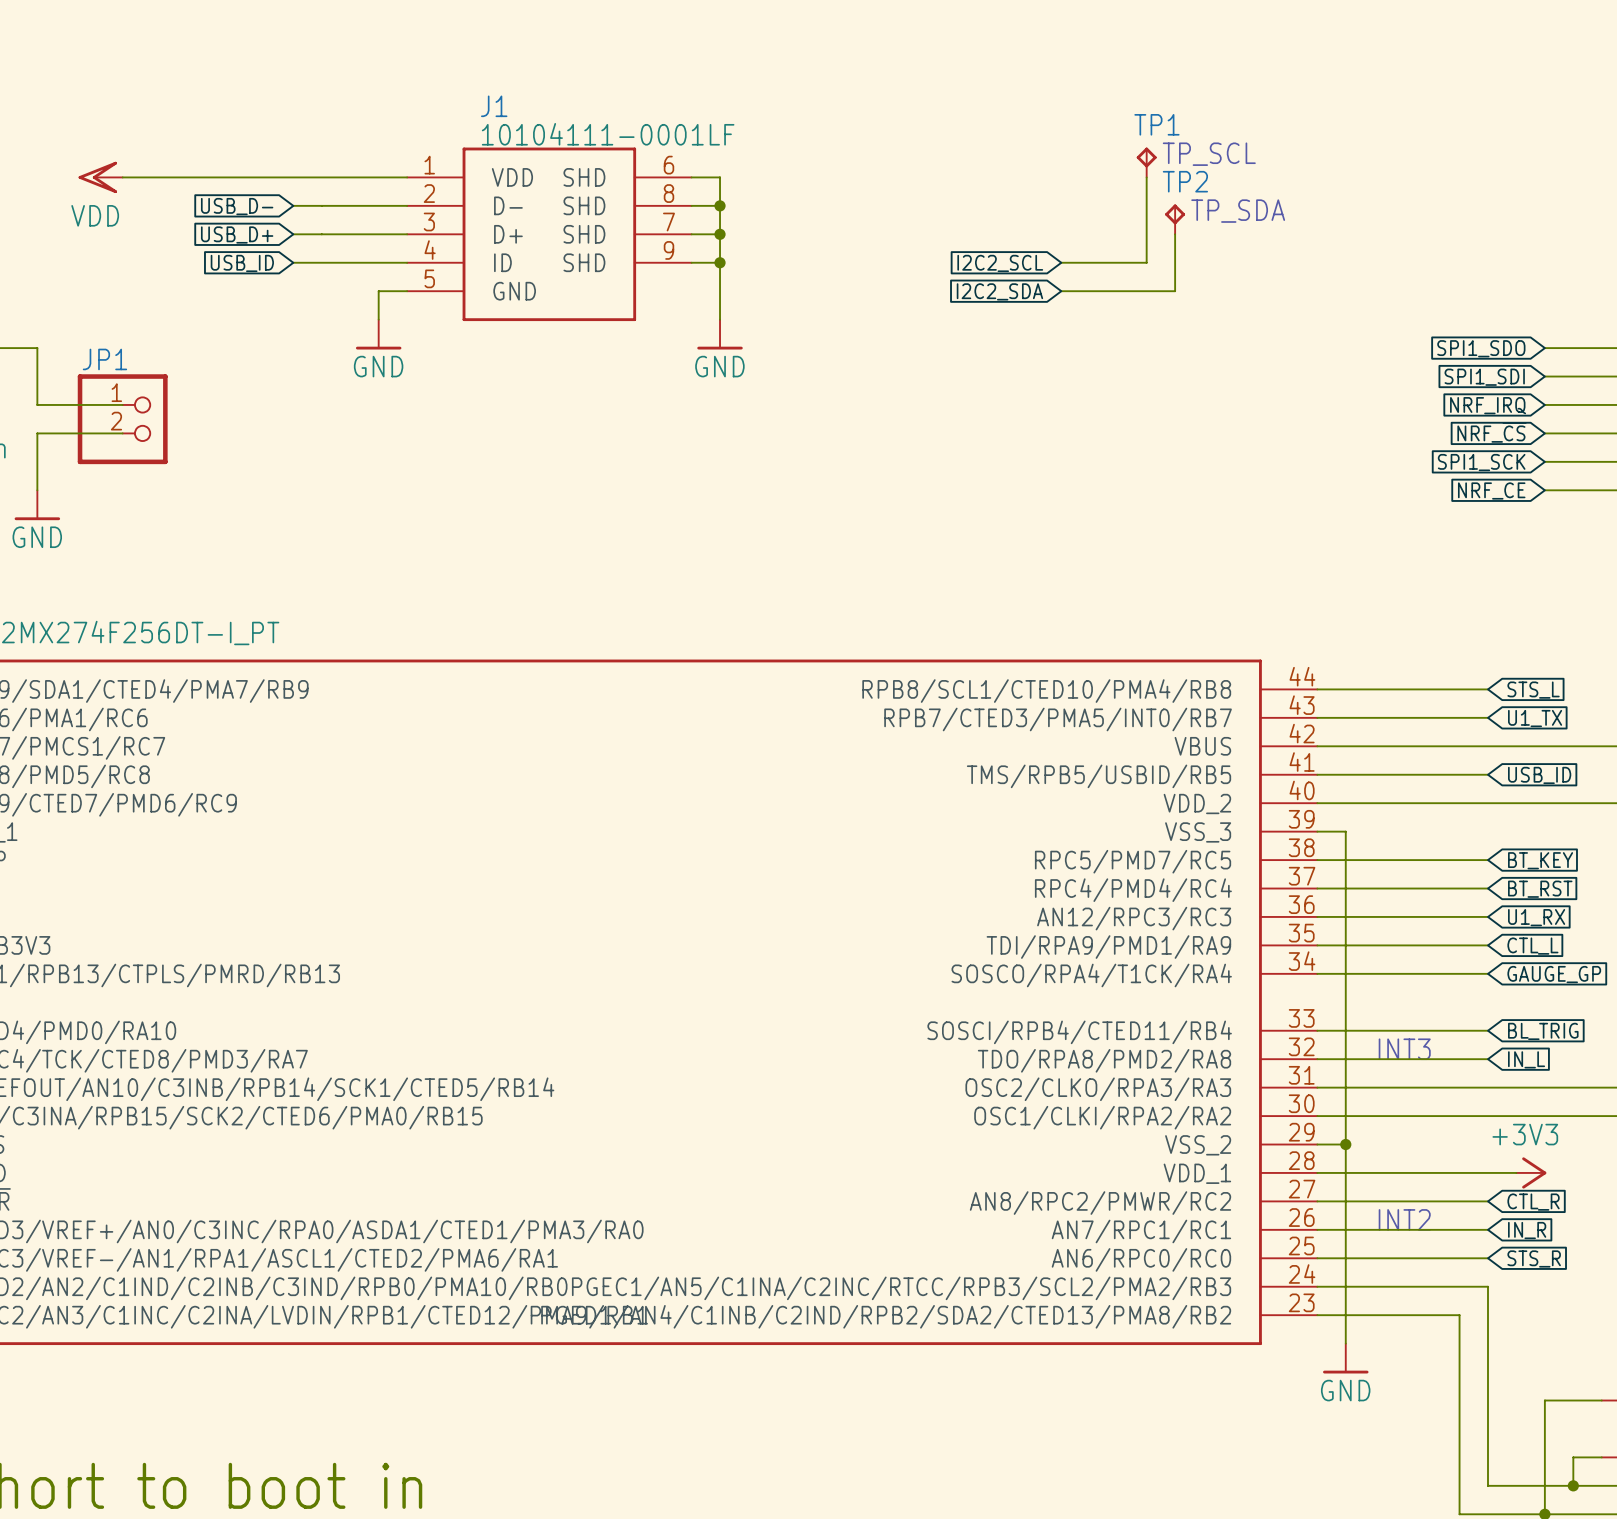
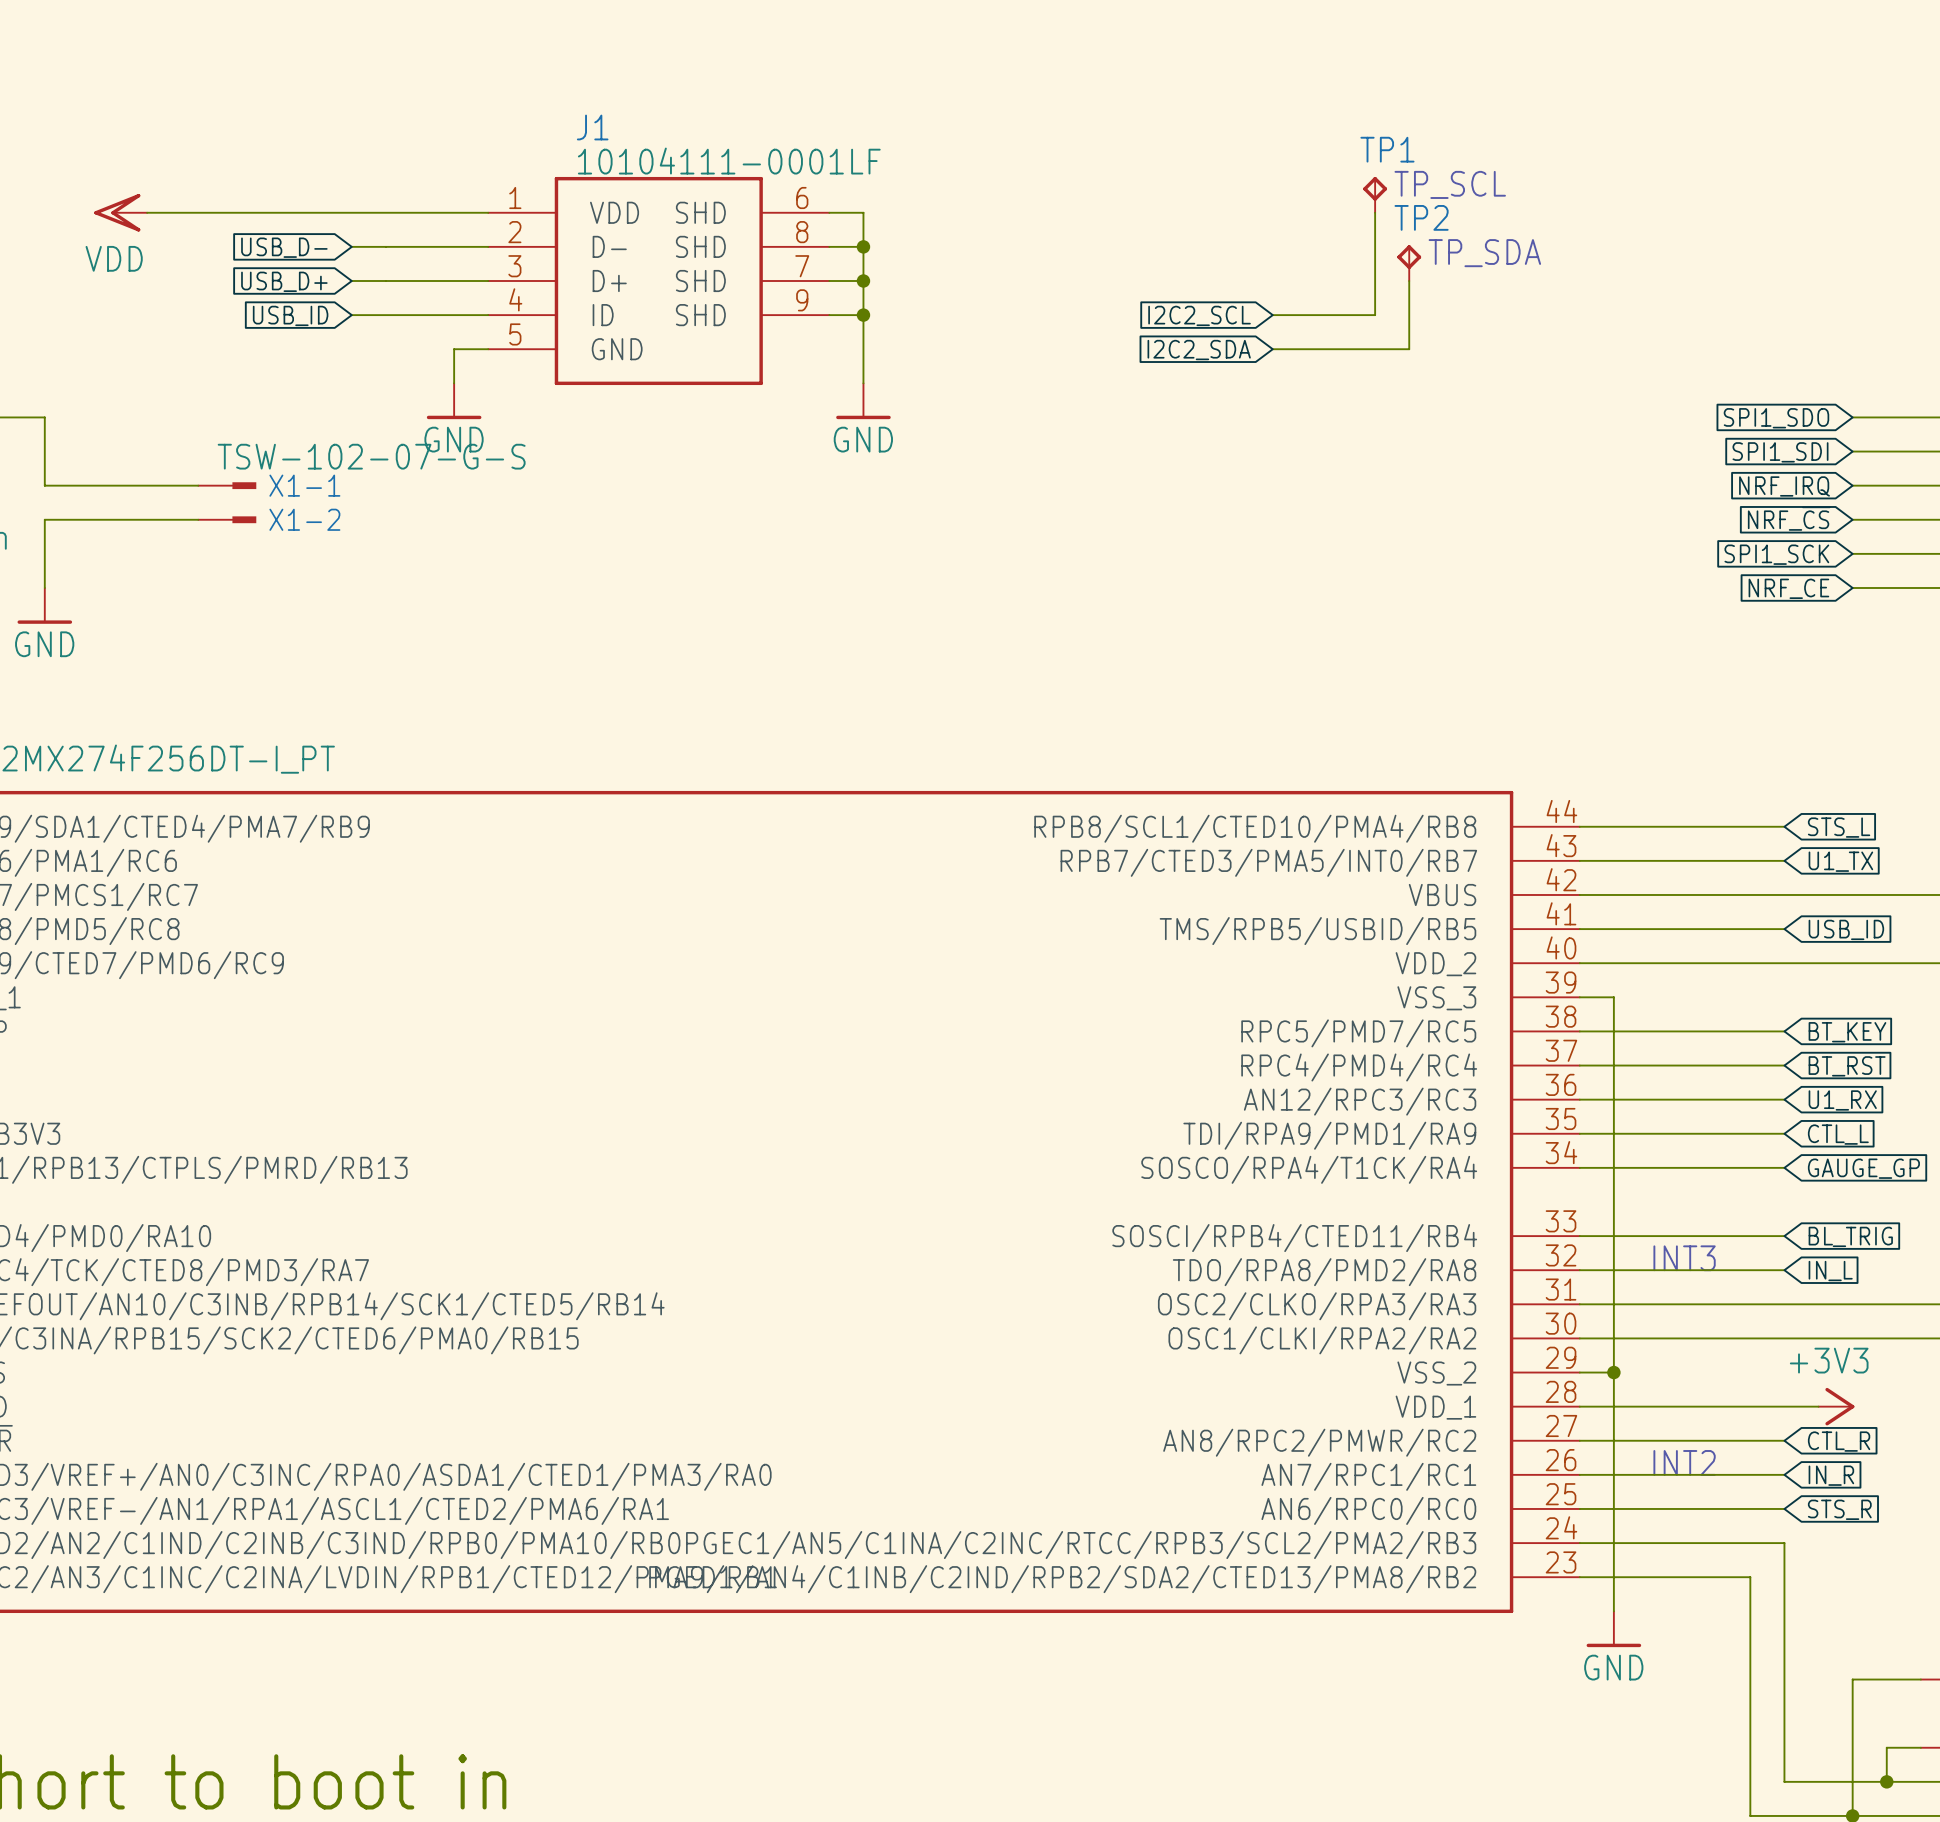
wire: none -> (147, 485) (198, 485)
X1-1: none -> TSW-102-07-G-S (227, 485)
JP1: (122, 419) -> none
wire: none -> (147, 519) (198, 519)
X1-2: none -> (227, 519)

